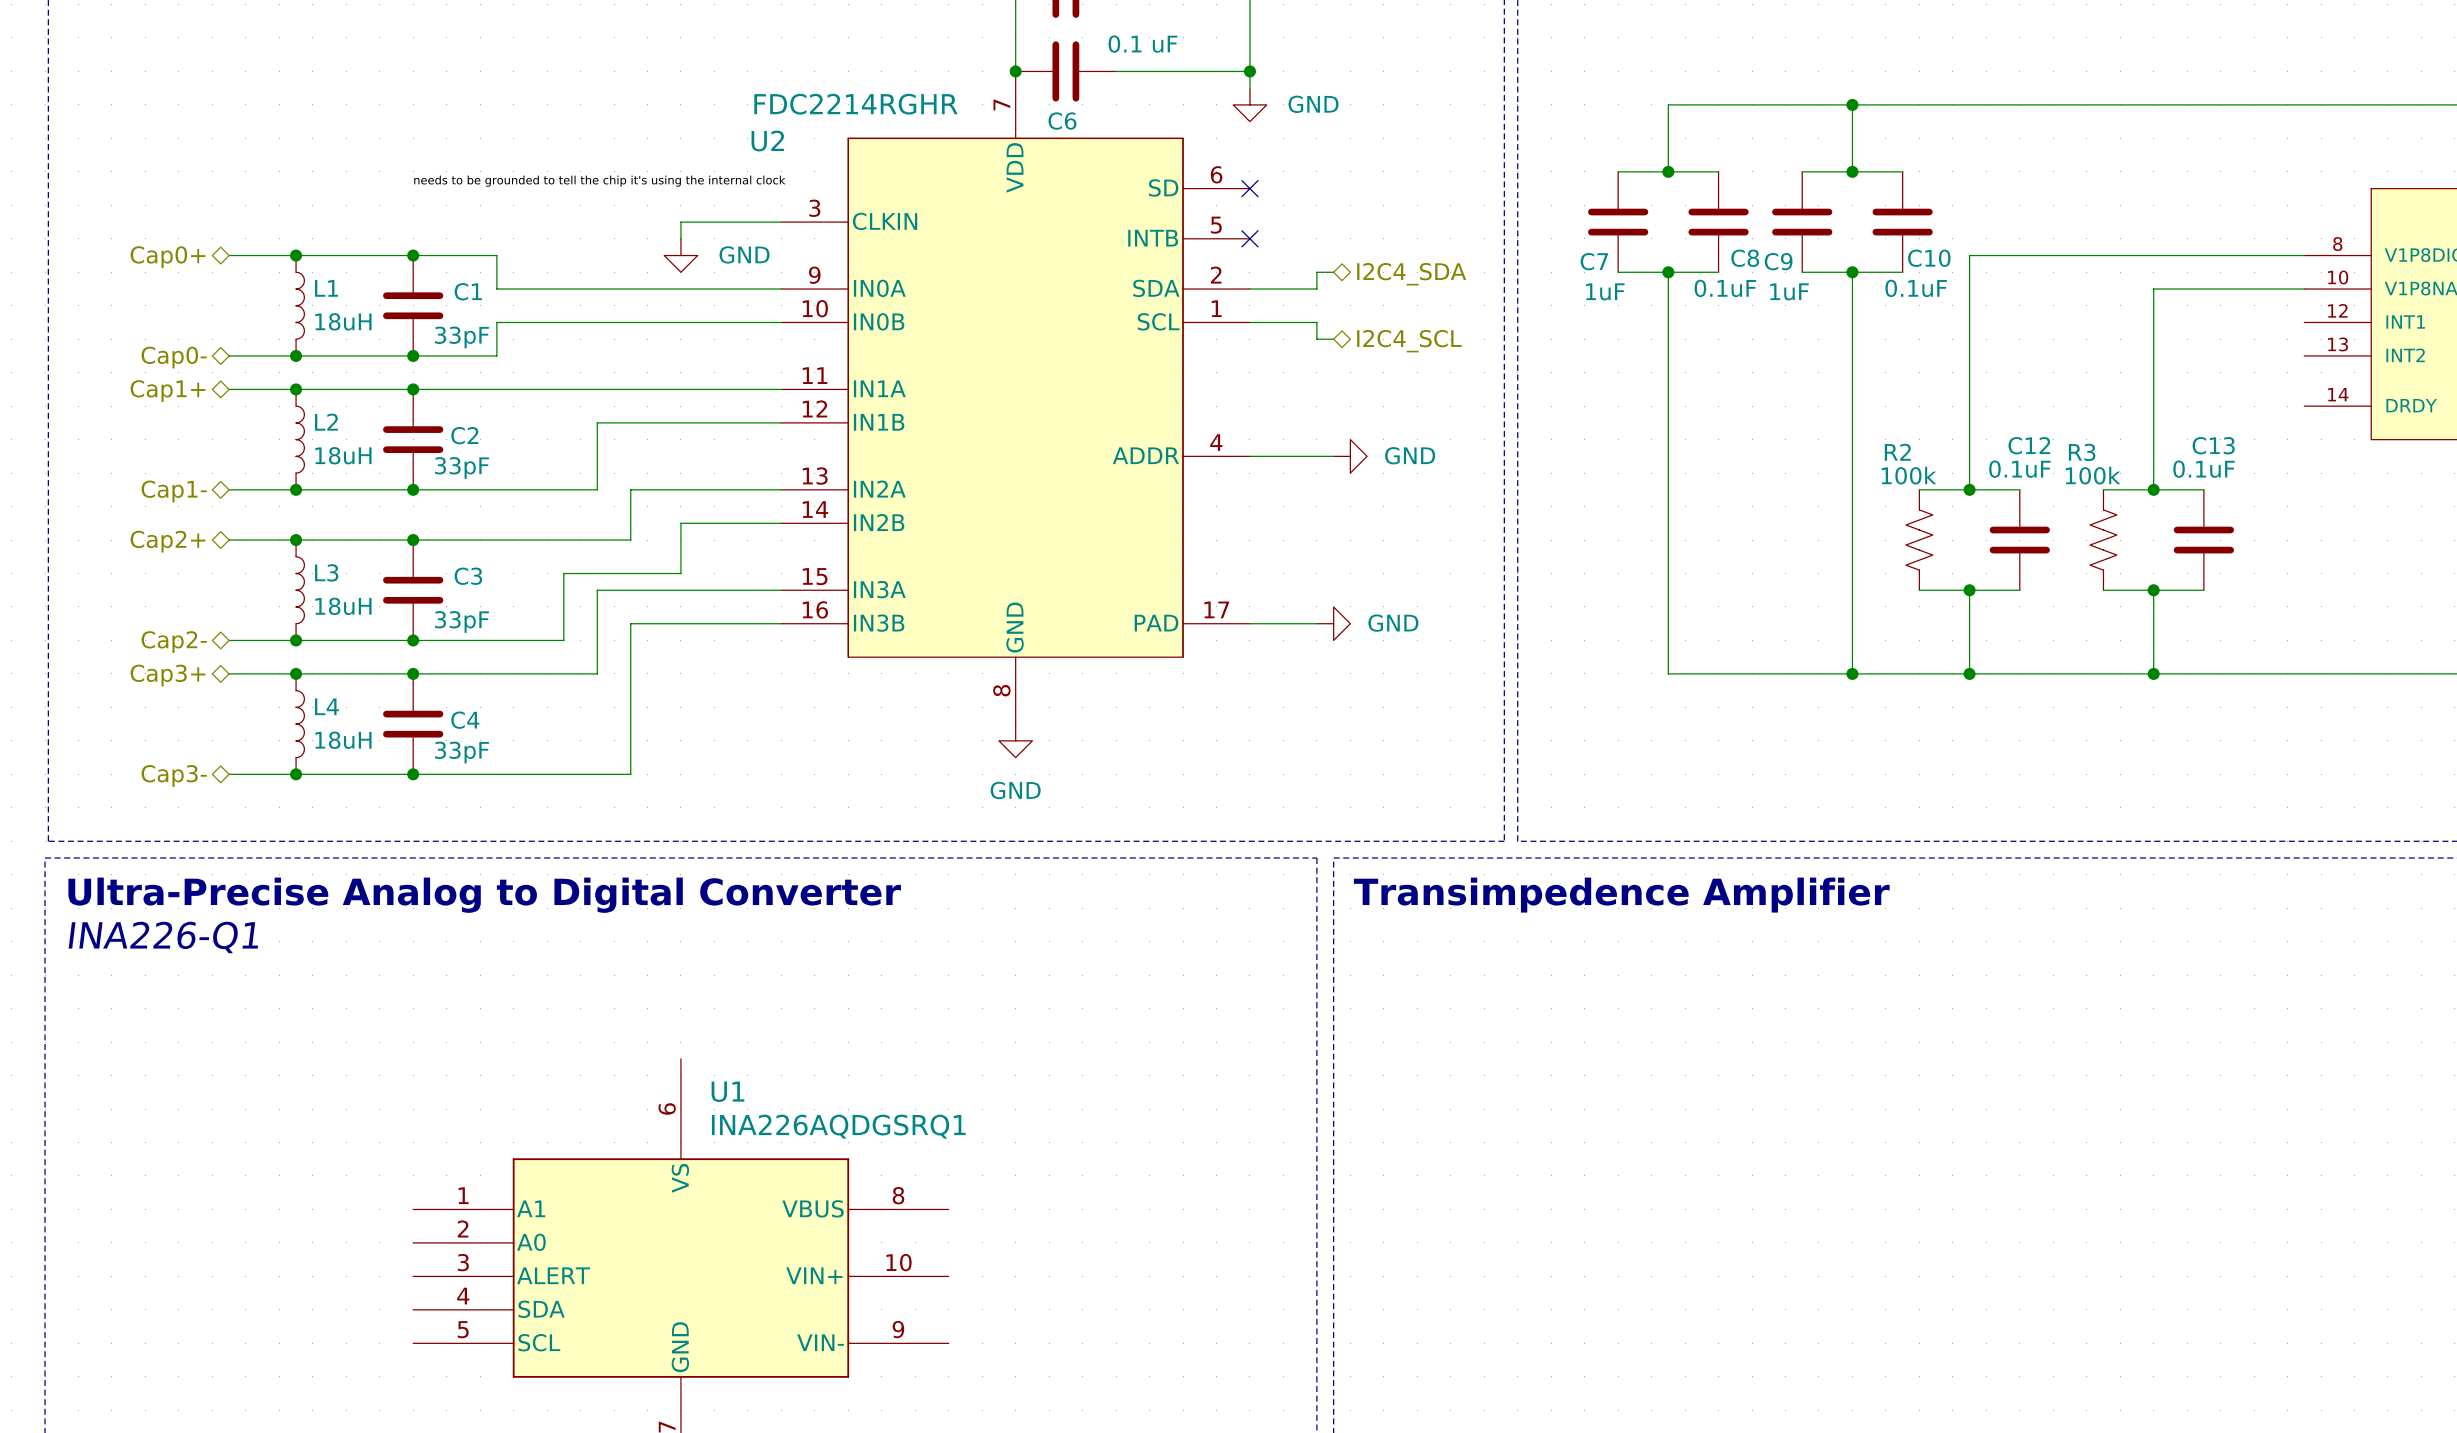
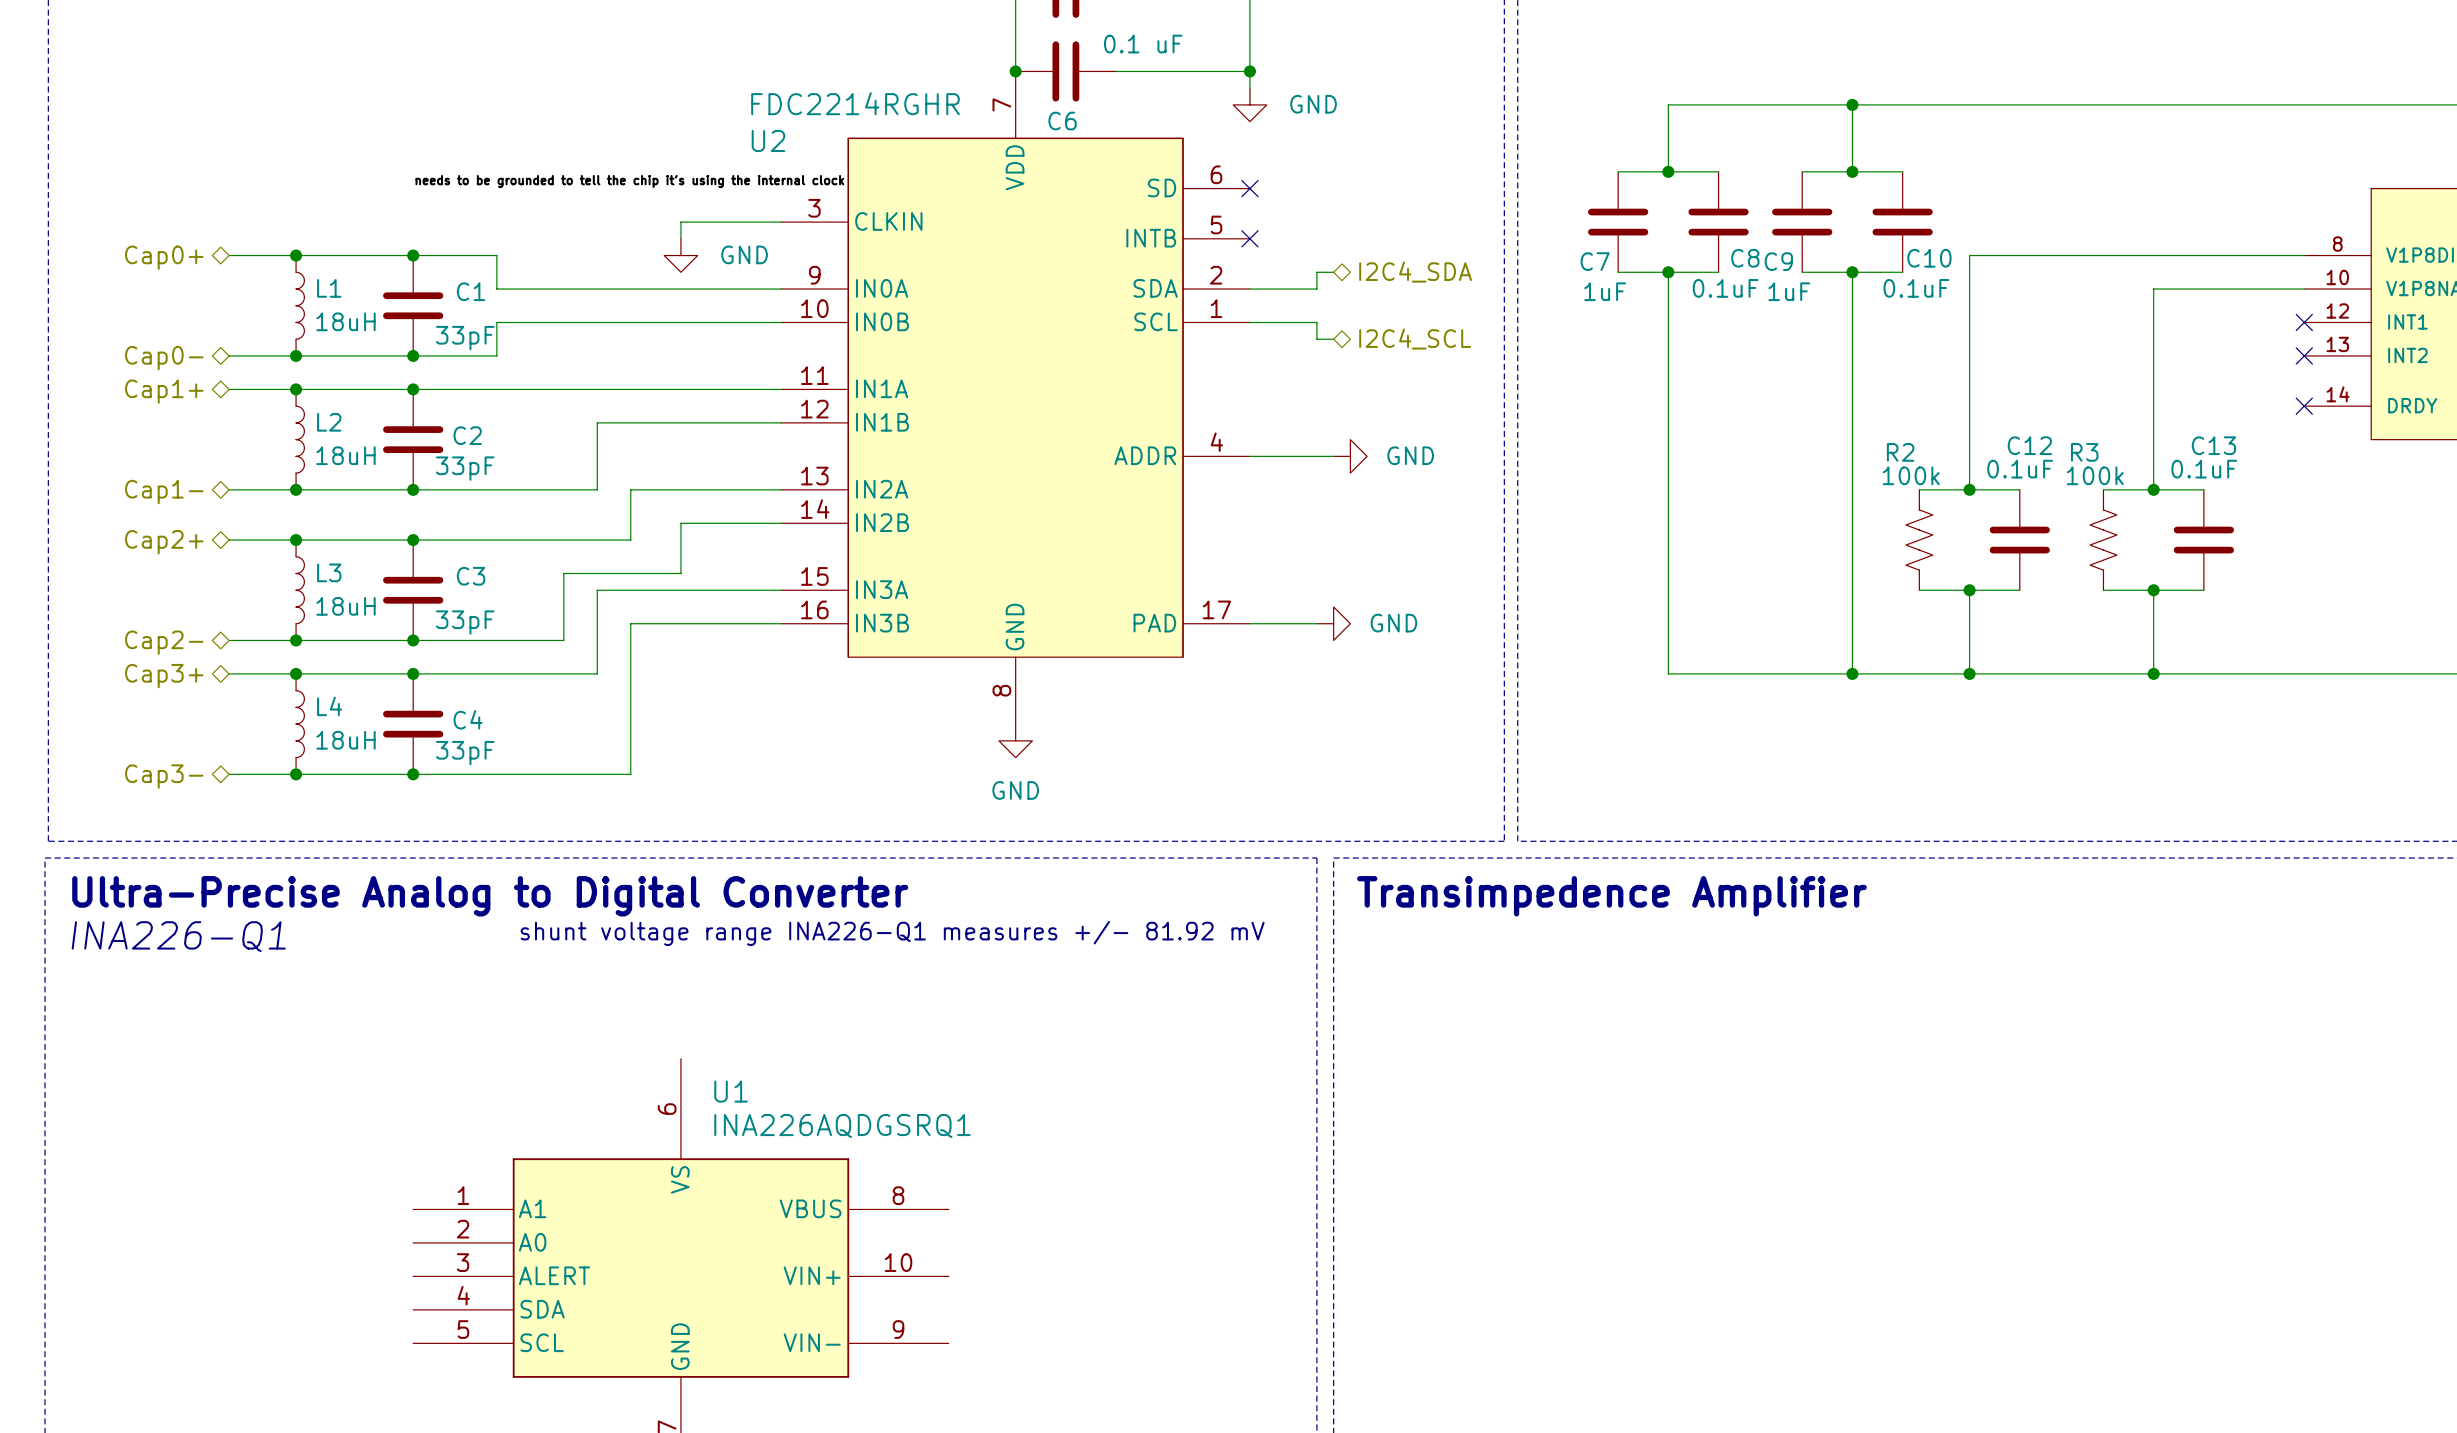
no-connect mark: none -> (2304, 322)
no-connect mark: none -> (2304, 355)
no-connect mark: none -> (2304, 406)
text: none -> shunt voltage range INA226-Q1 measures +/- 81.92 mV (892, 933)

